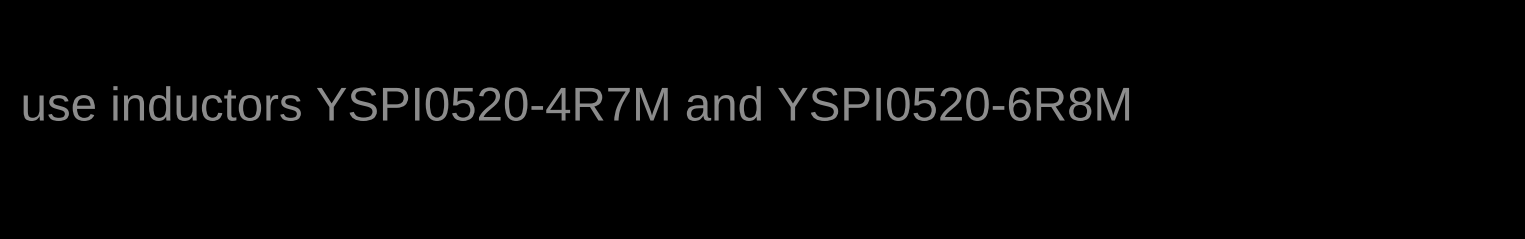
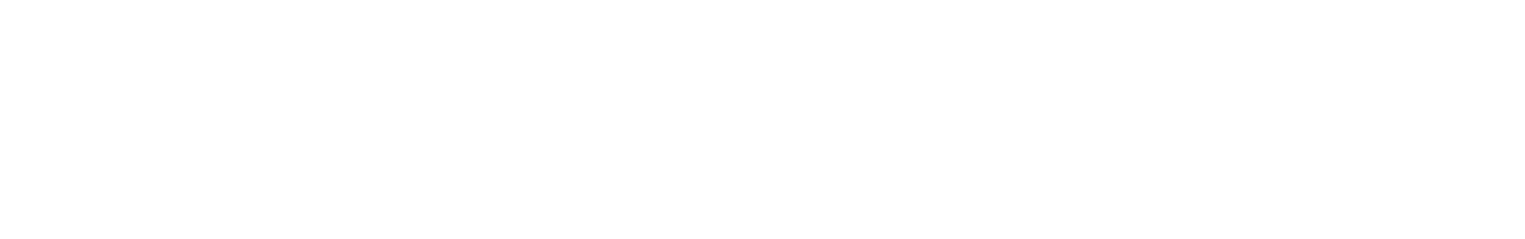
text: use inductors YSPI0520-4R7M and YSPI0520-6R8M (576, 103) -> none

